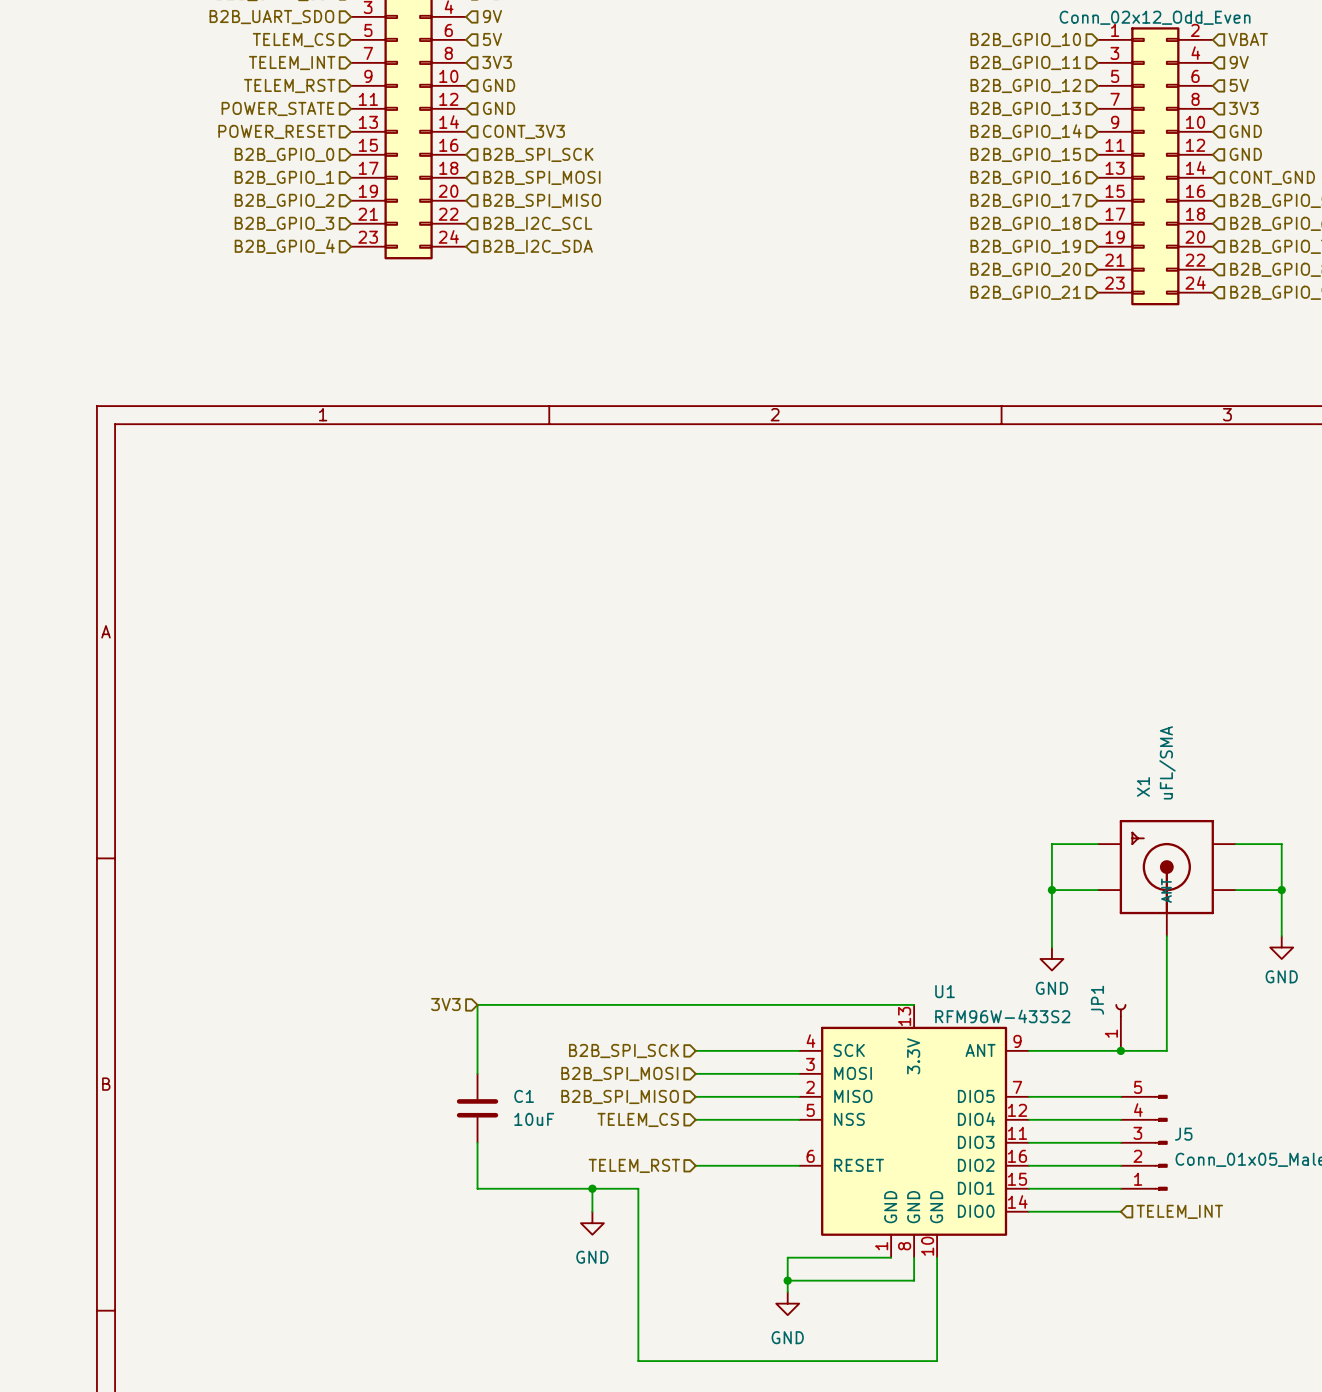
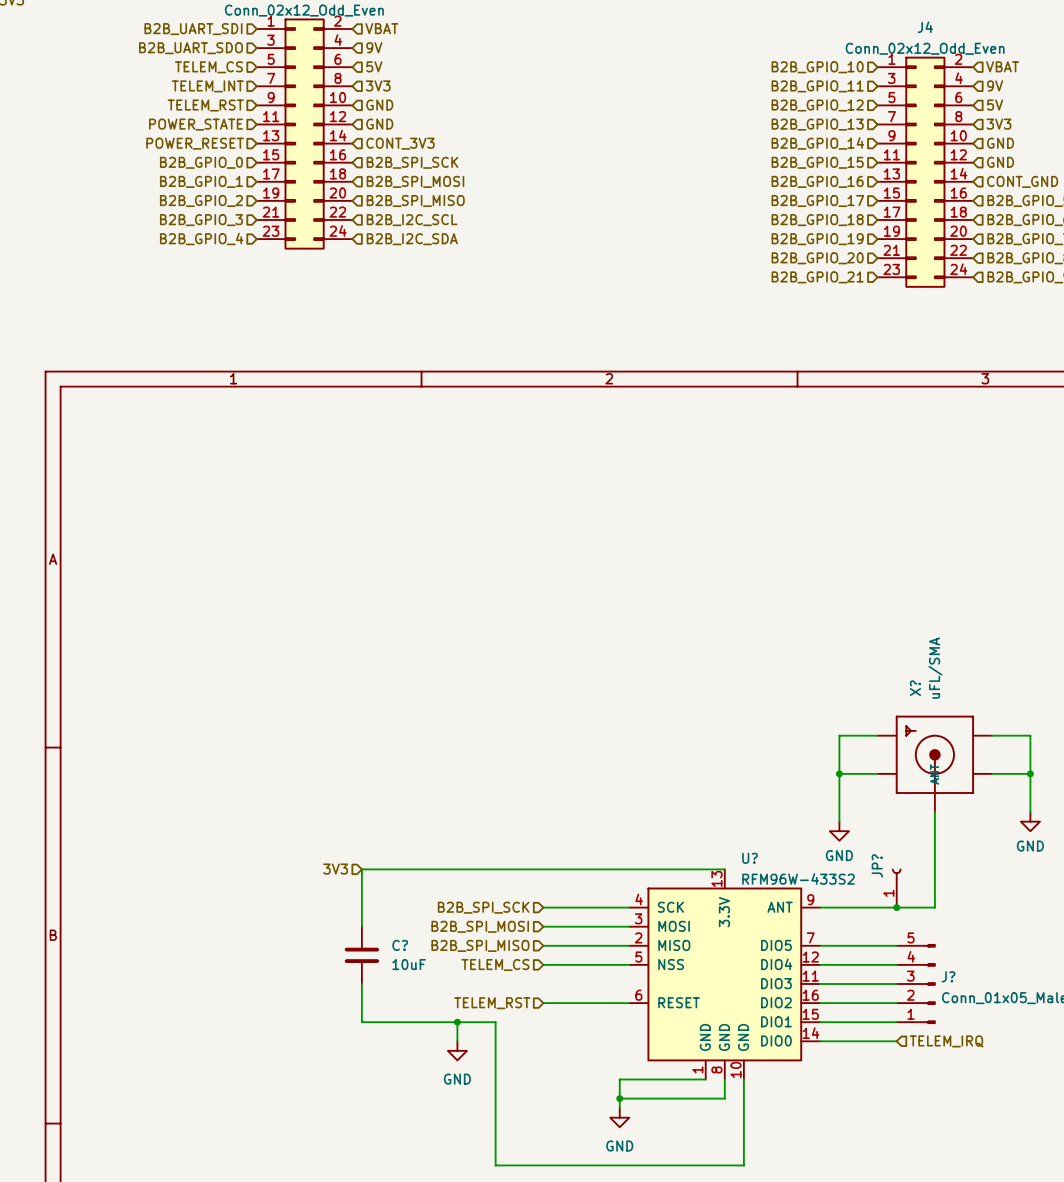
X1 name: X1 (1143, 786) -> X? (915, 688)
U1 name: U1 (945, 991) -> U? (750, 858)
JP1 name: JP1 (1097, 1000) -> JP? (877, 865)
C1 name: C1 (524, 1096) -> C? (400, 945)
J5 name: J5 (1183, 1134) -> J? (948, 976)
hierarchical label: TELEM_INT (1179, 1211) -> TELEM_IRQ (946, 1041)

